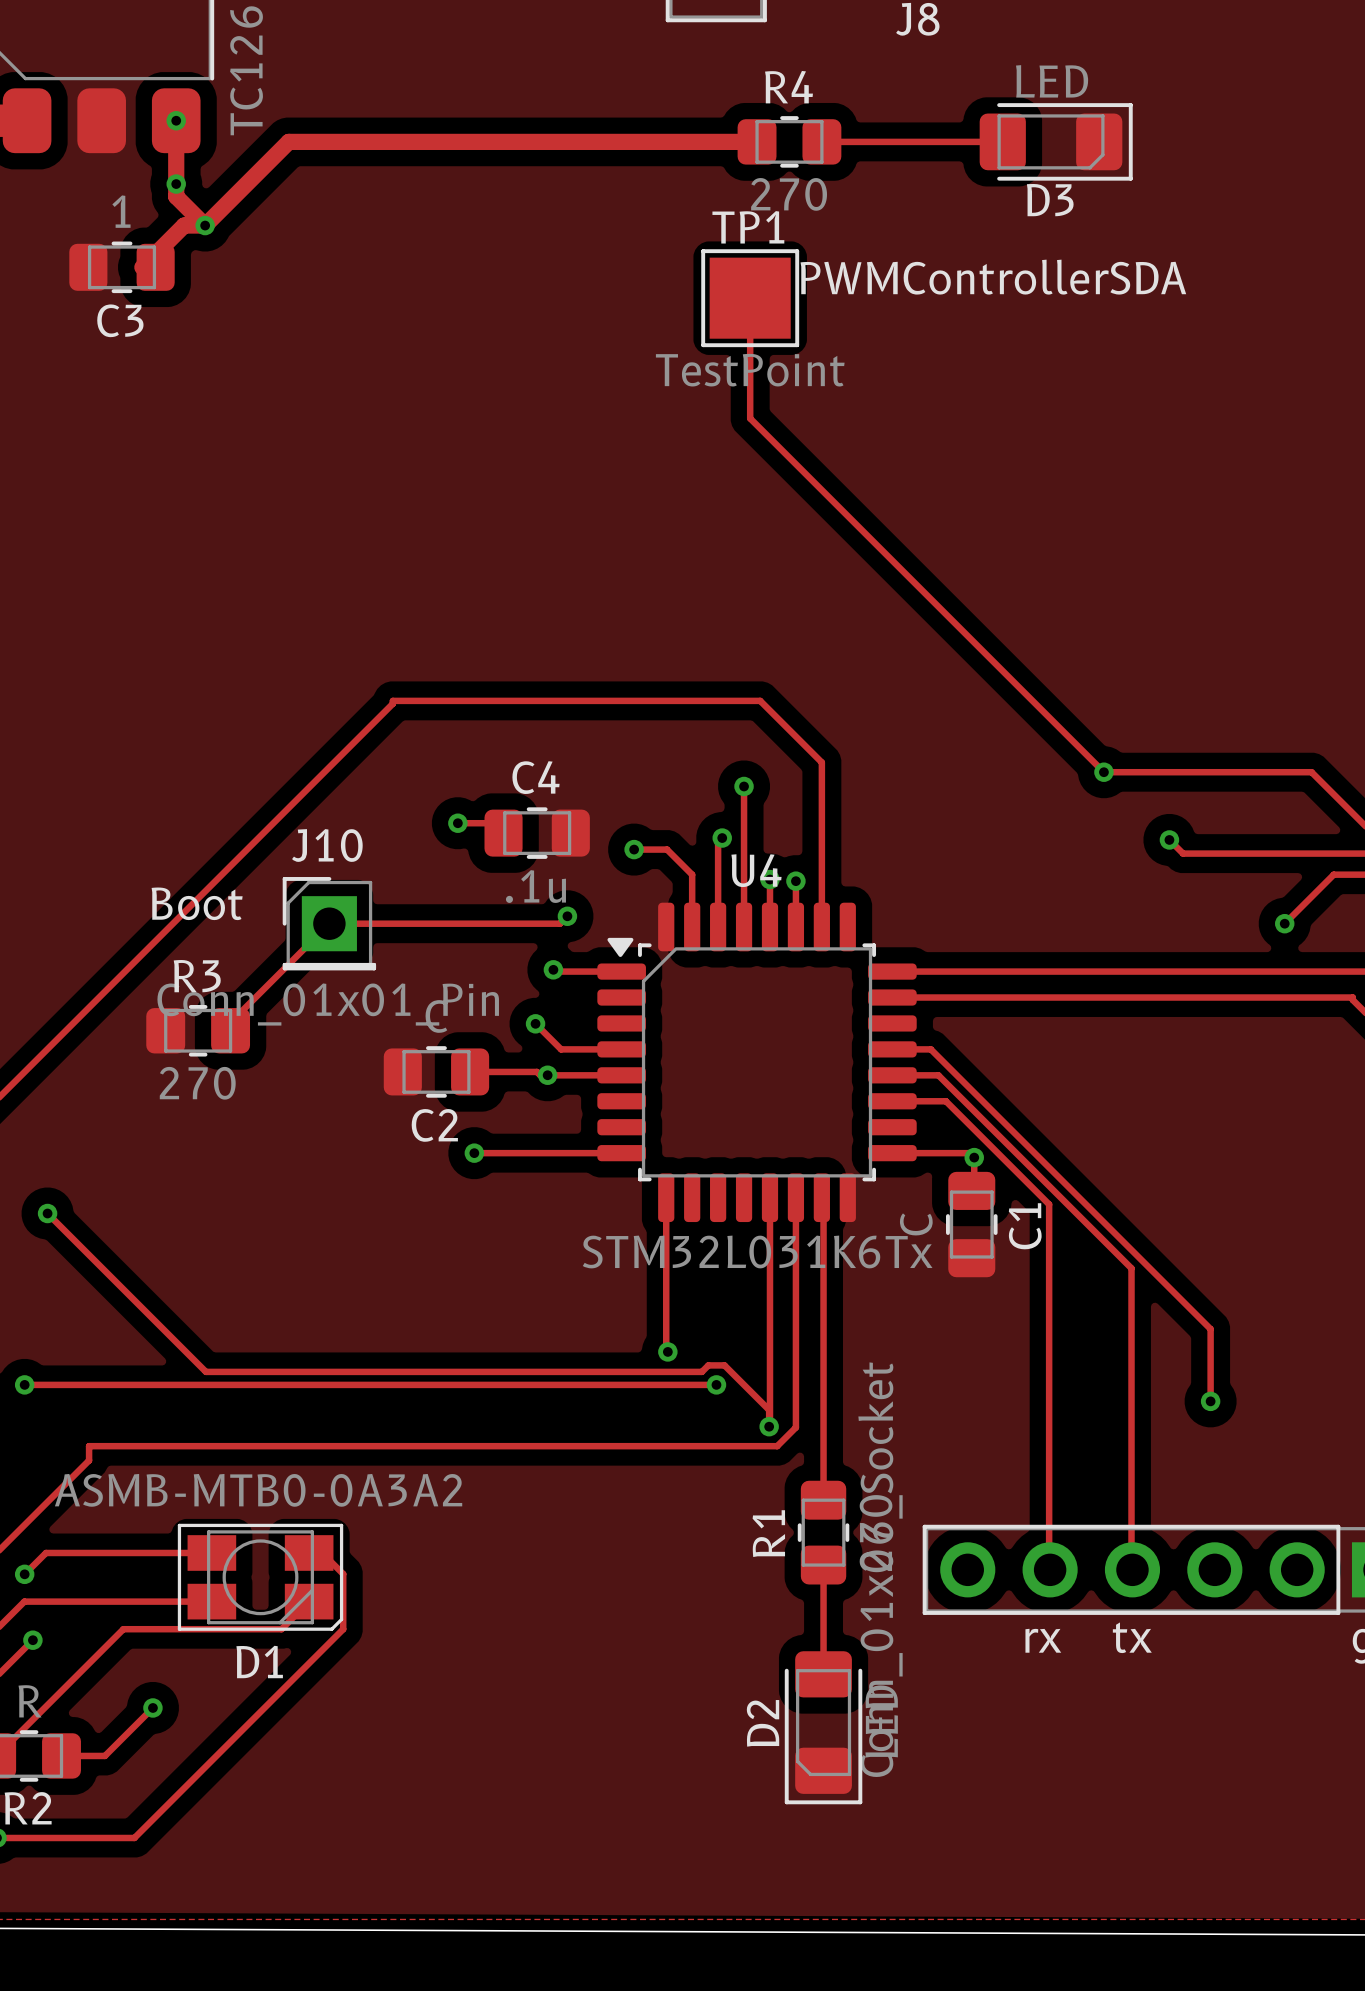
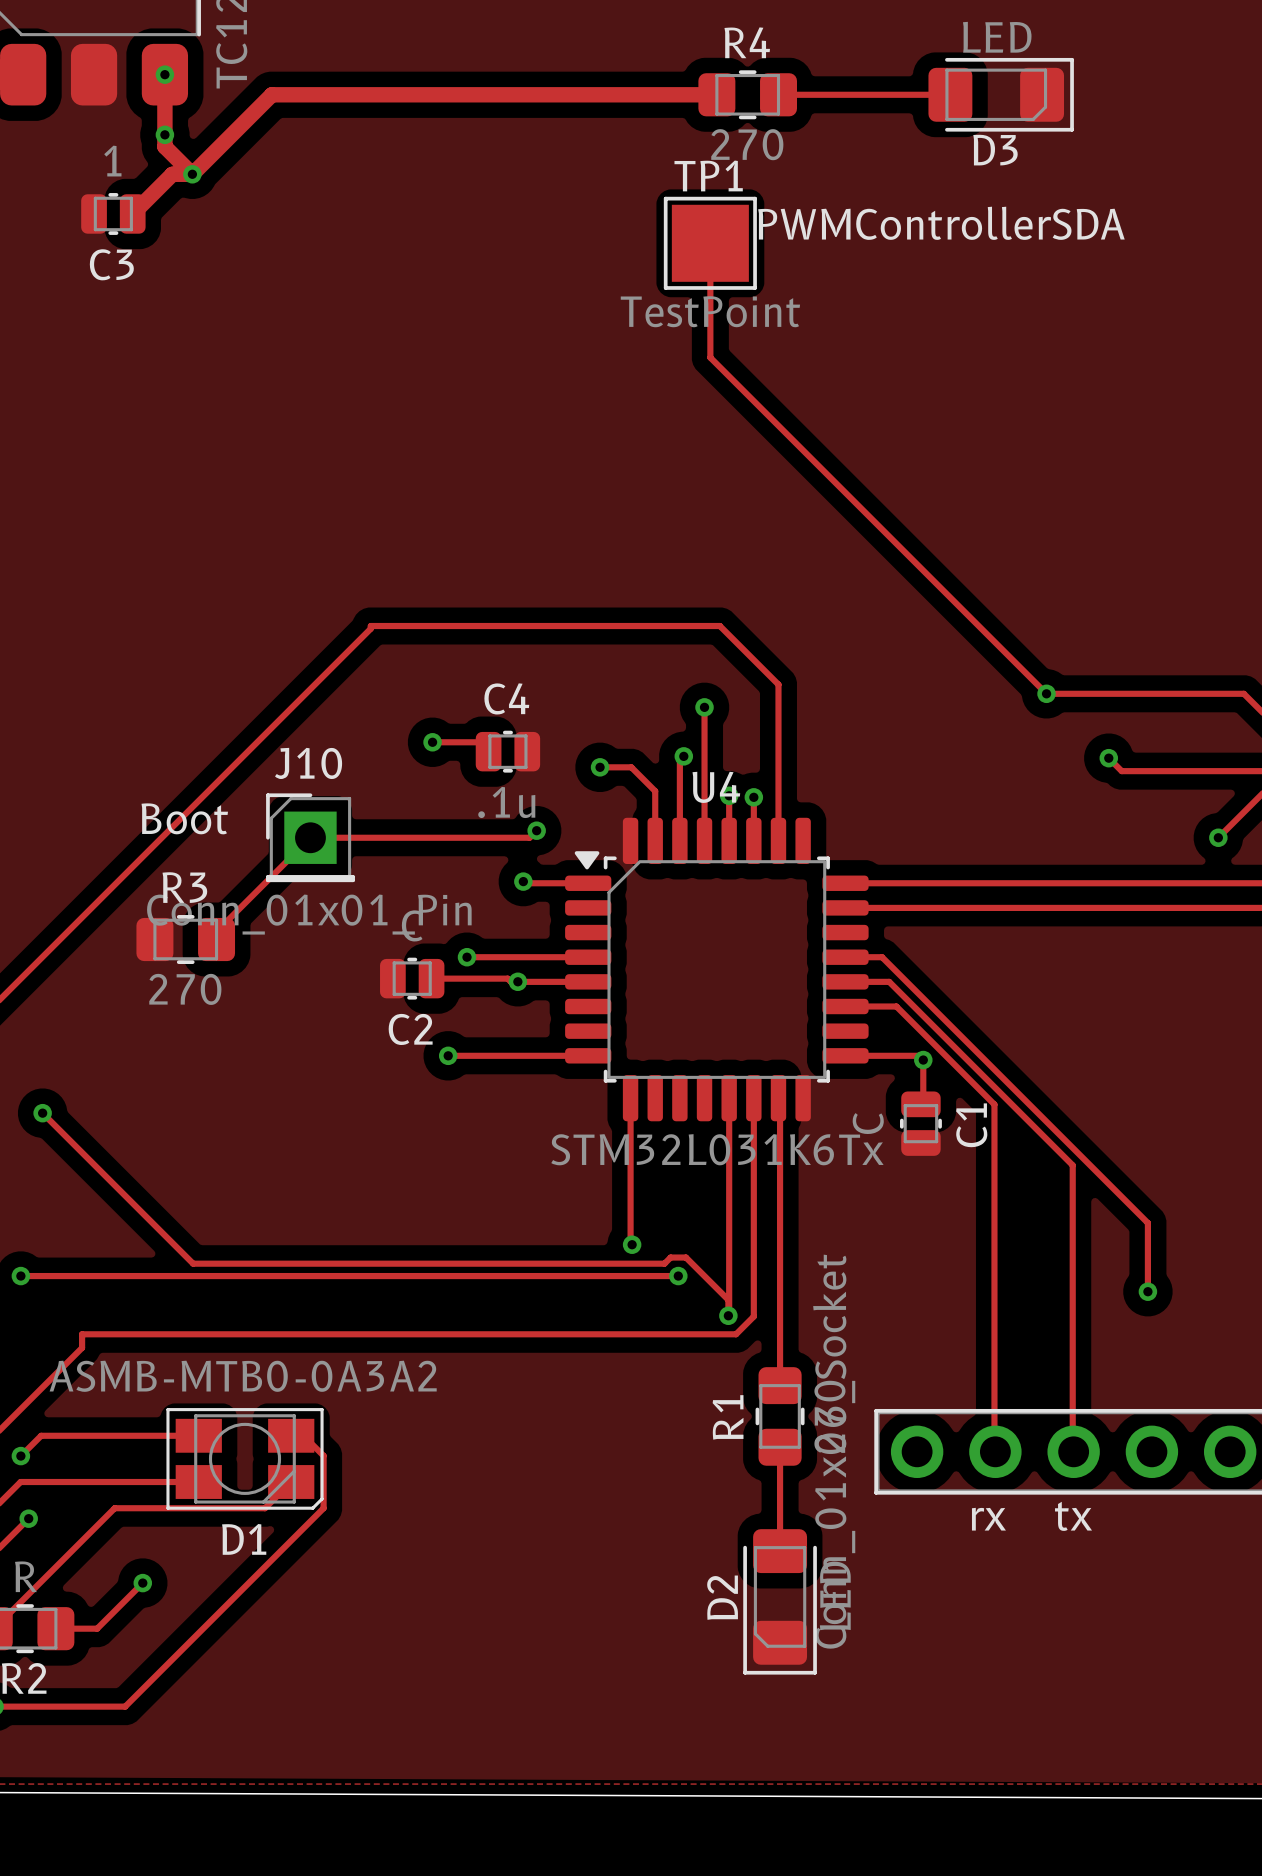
C3 footprint: [69, 241, 175, 294] -> [81, 193, 146, 235]
C4 footprint: [484, 807, 590, 859] -> [475, 730, 541, 773]
track: (535, 1023) (561, 1049) -> (467, 957) (530, 957)
via position: (535, 1023) -> (467, 957)
C2 footprint: [383, 1046, 490, 1098] -> [380, 957, 445, 1000]
C1 footprint: [946, 1171, 998, 1278] -> [899, 1091, 942, 1156]

